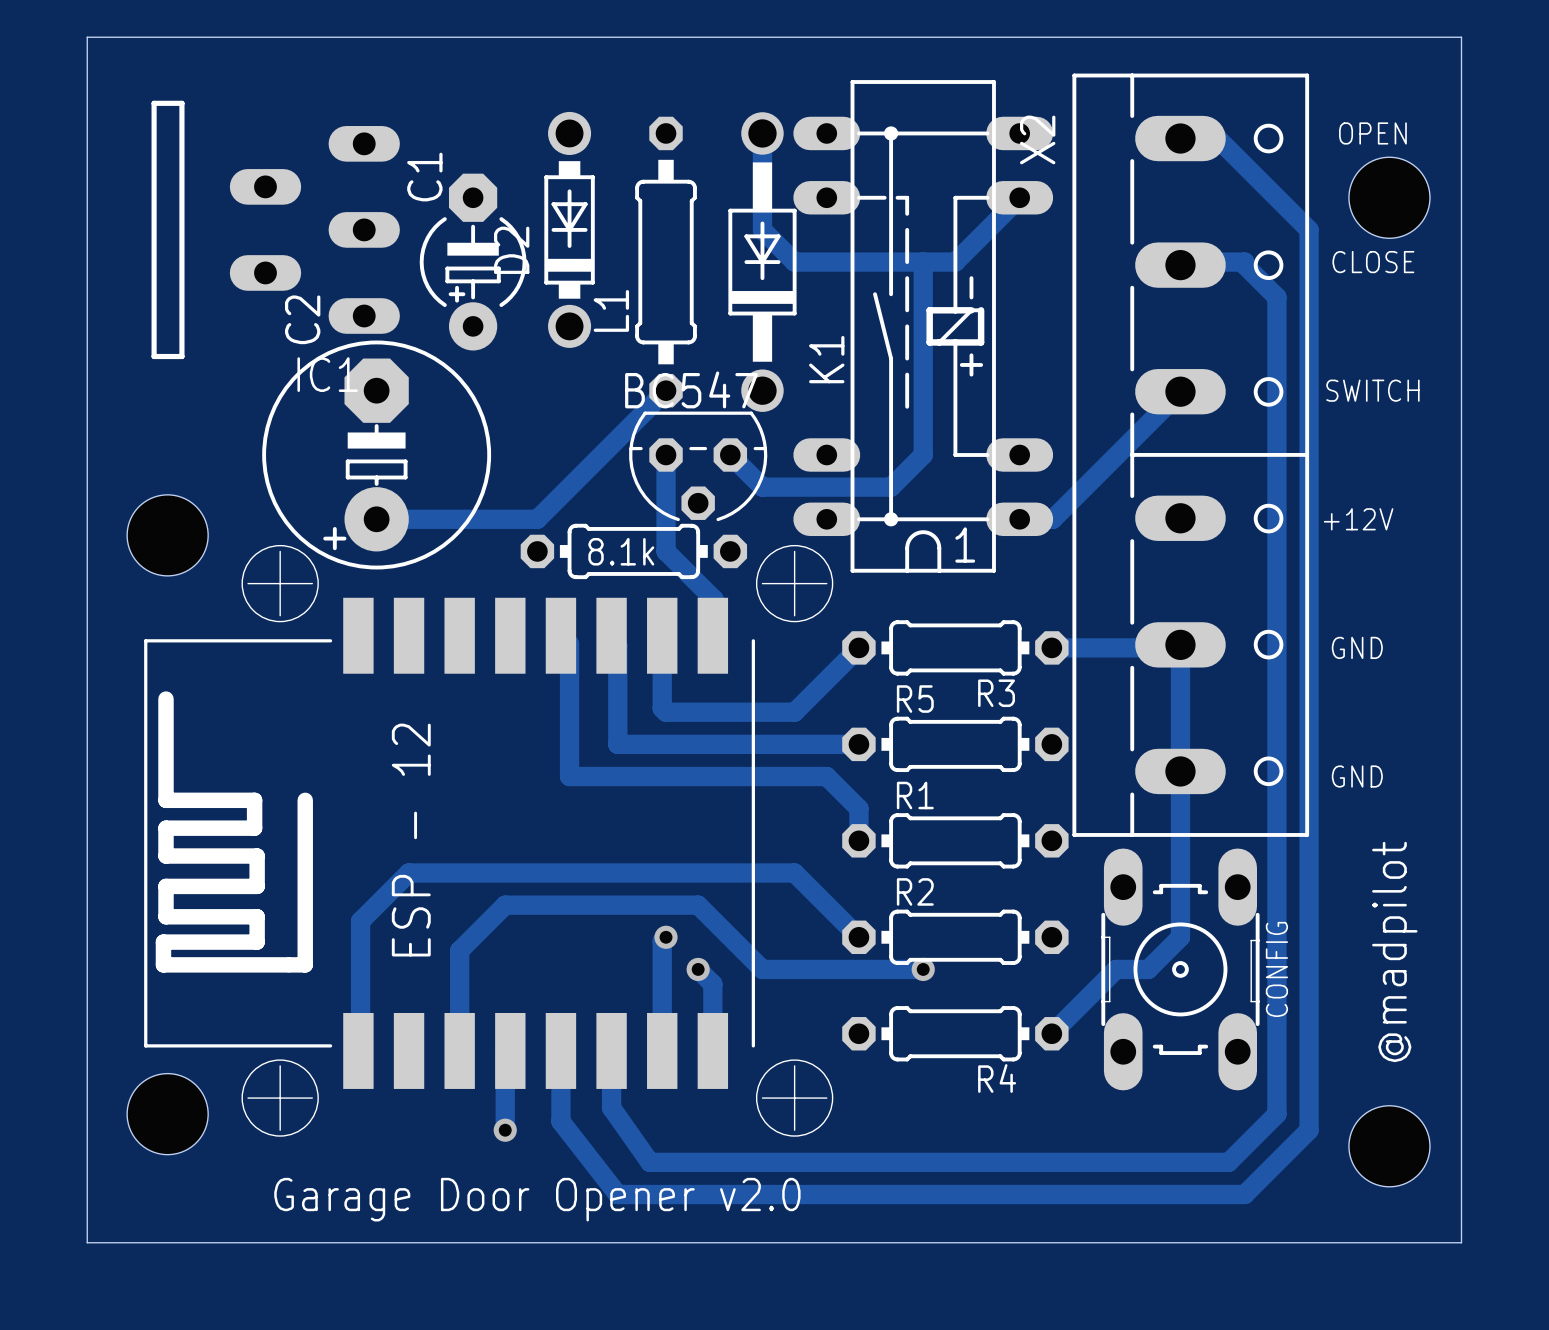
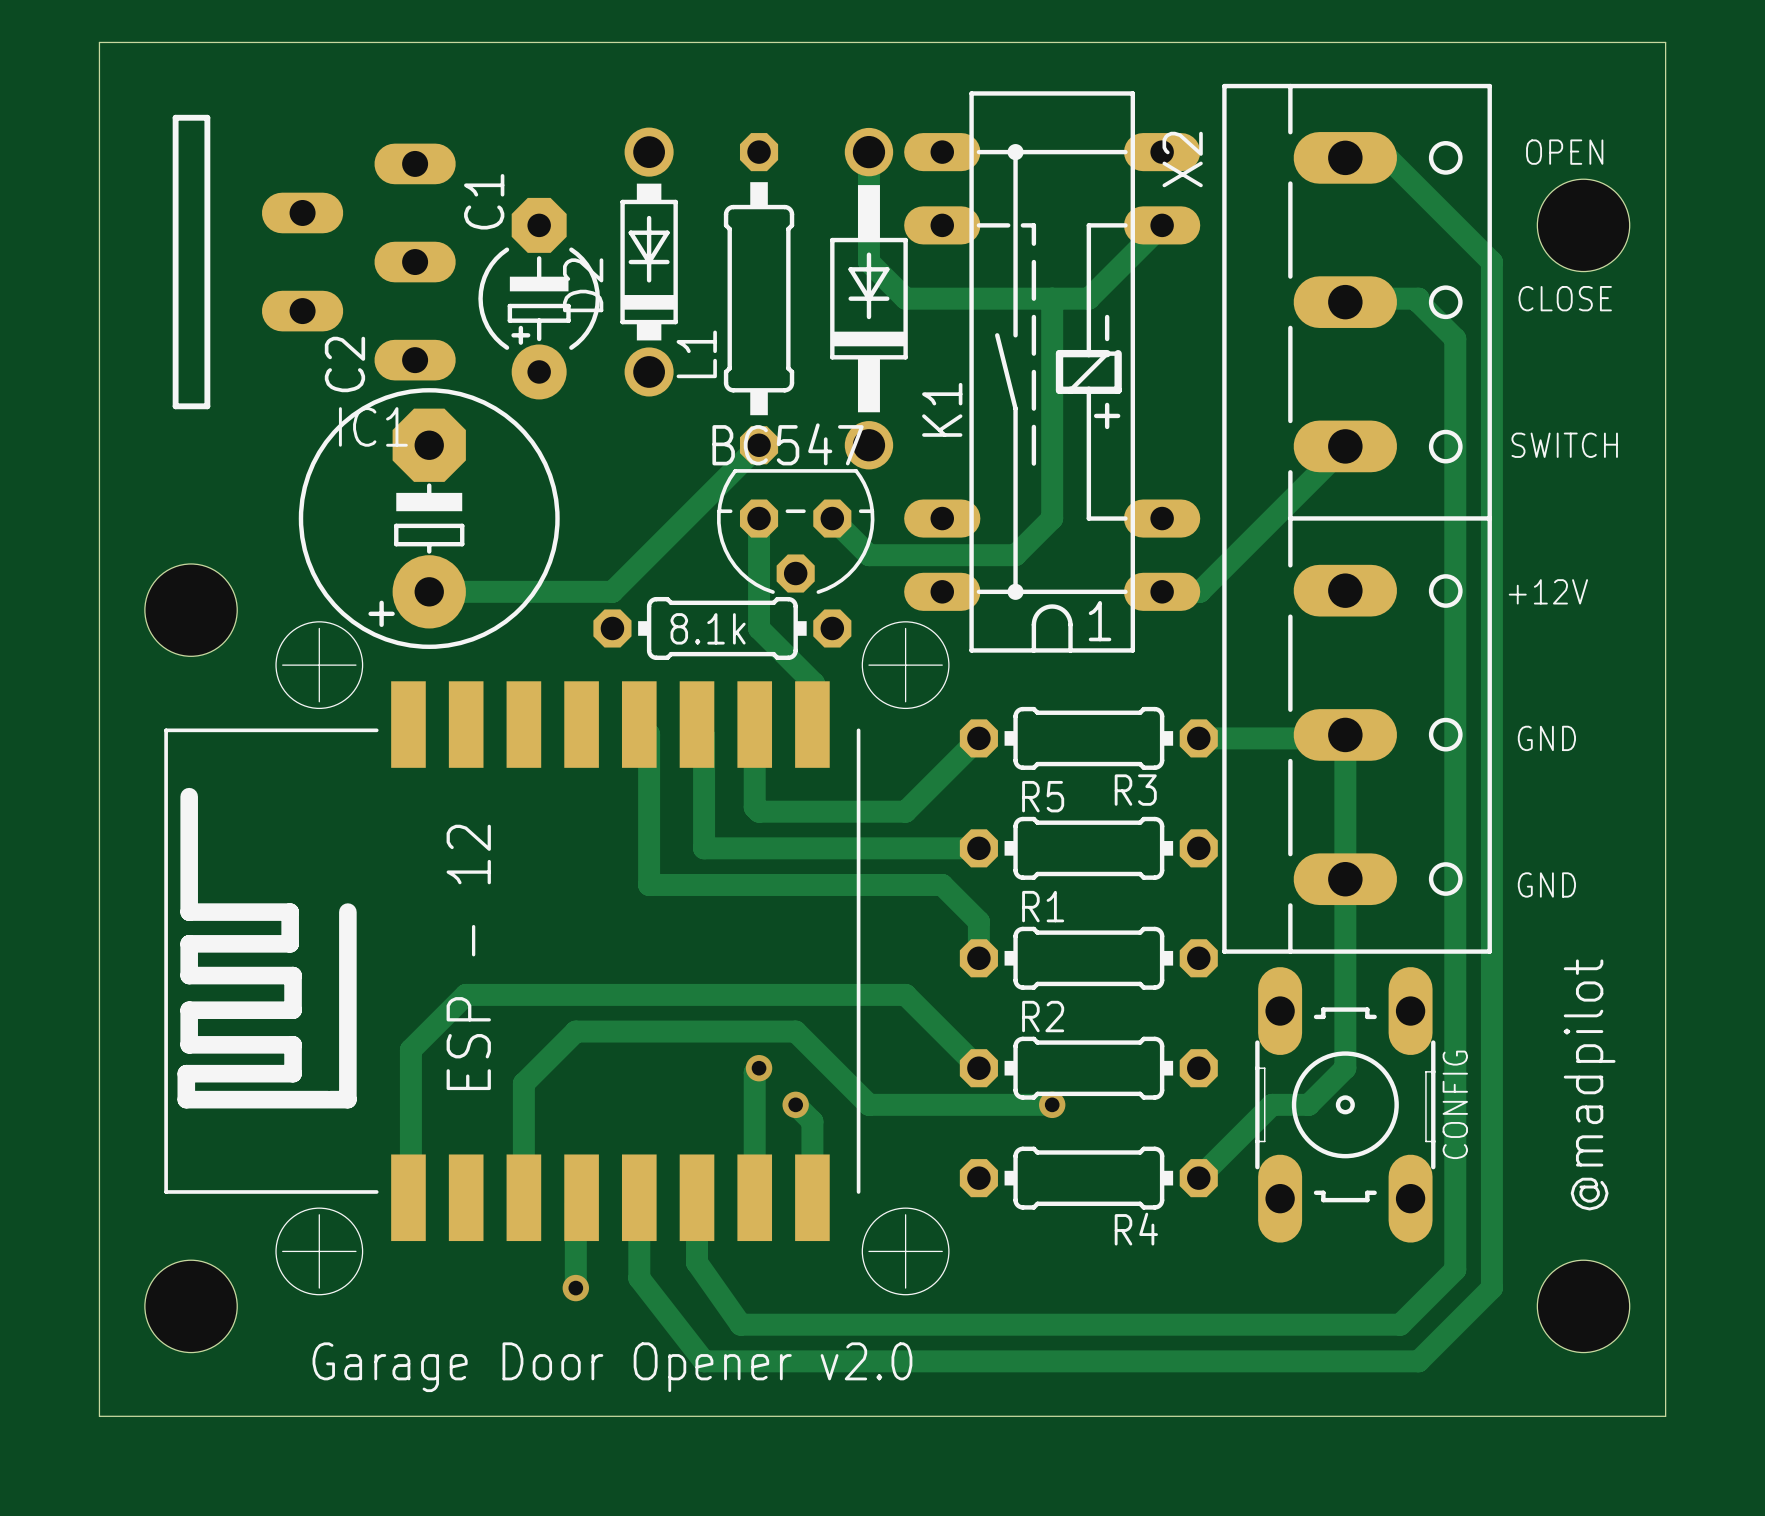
hole position: (167, 1114) -> (191, 1306)

